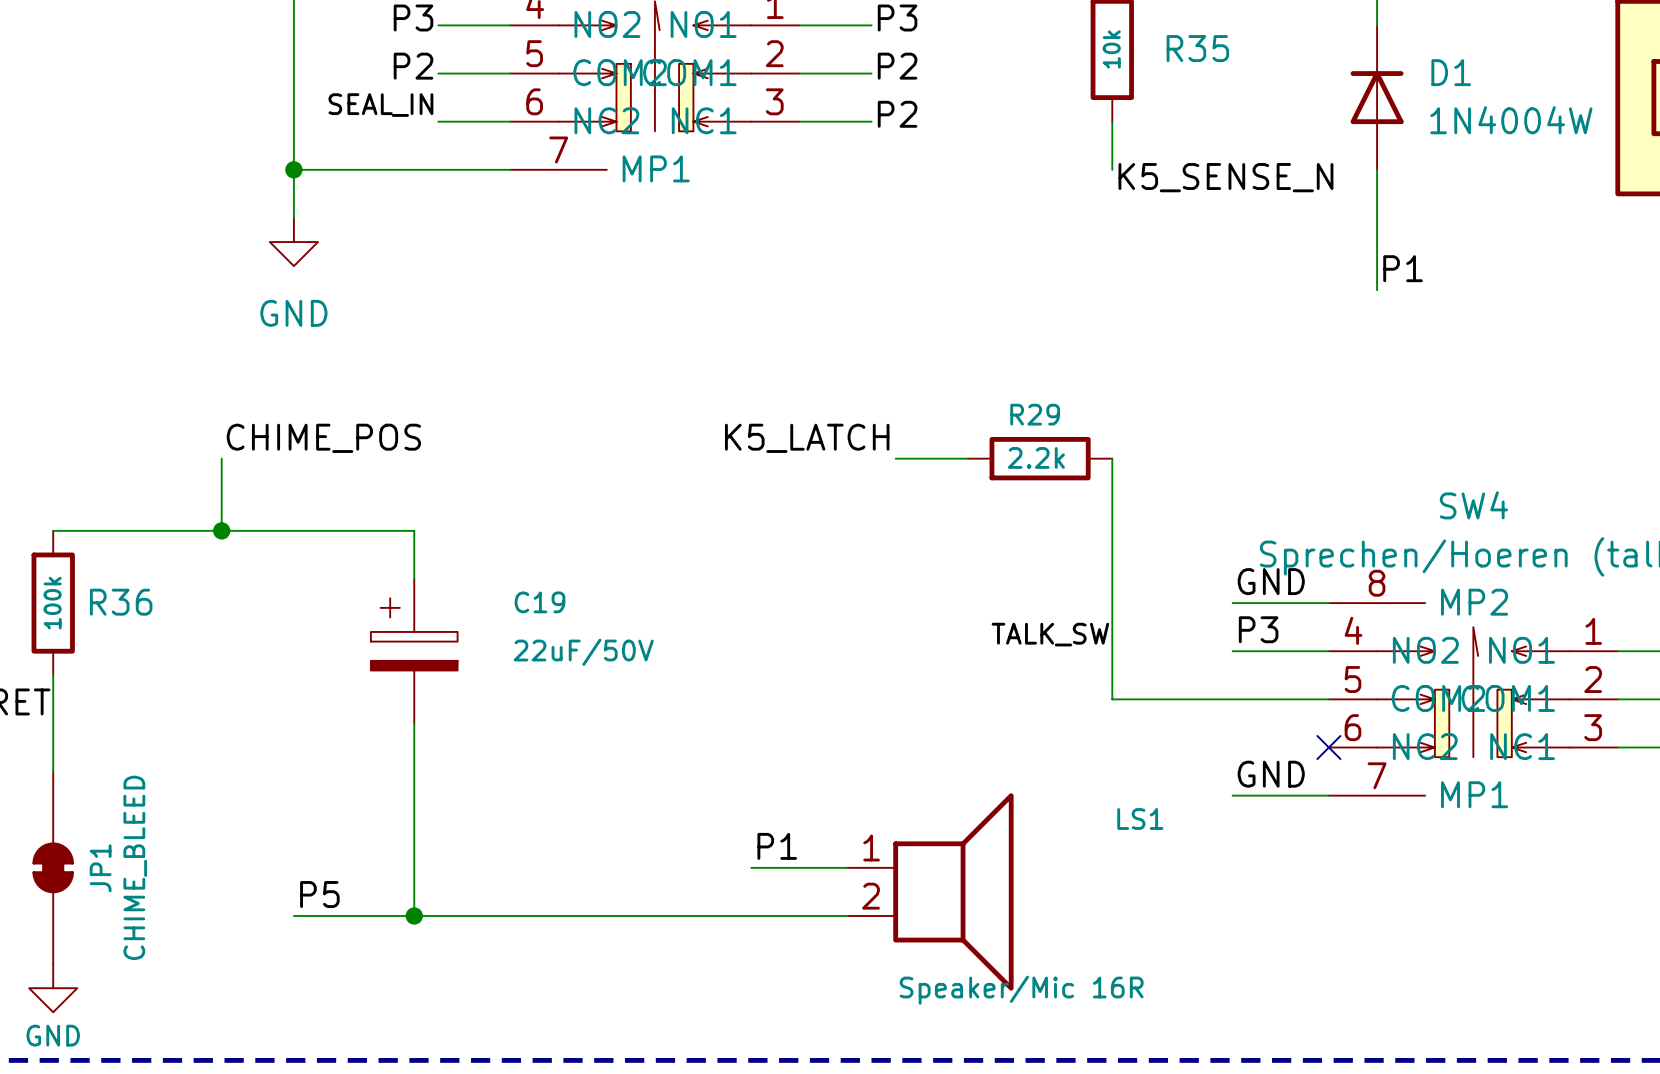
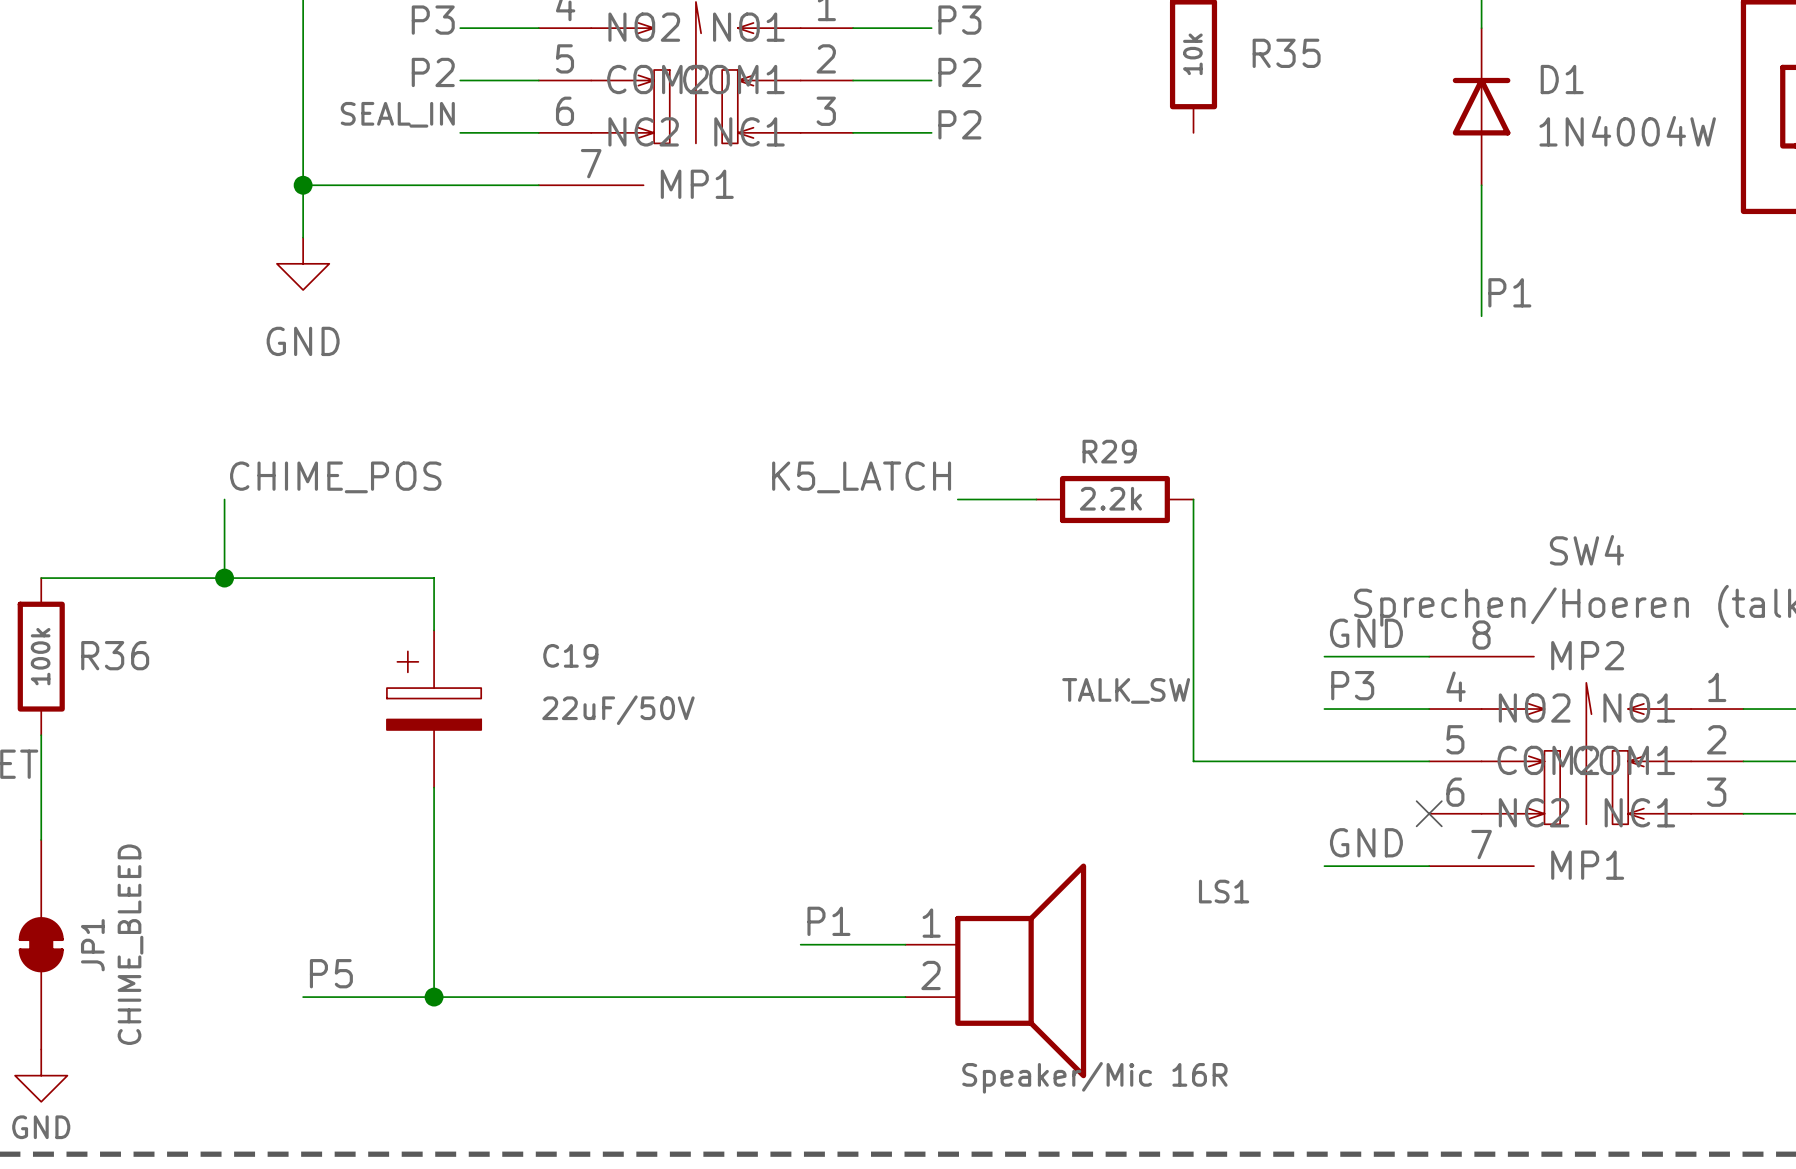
wire: (1112, 121) (1112, 169) -> none
label: K5_SENSE_N (1225, 177) -> none

